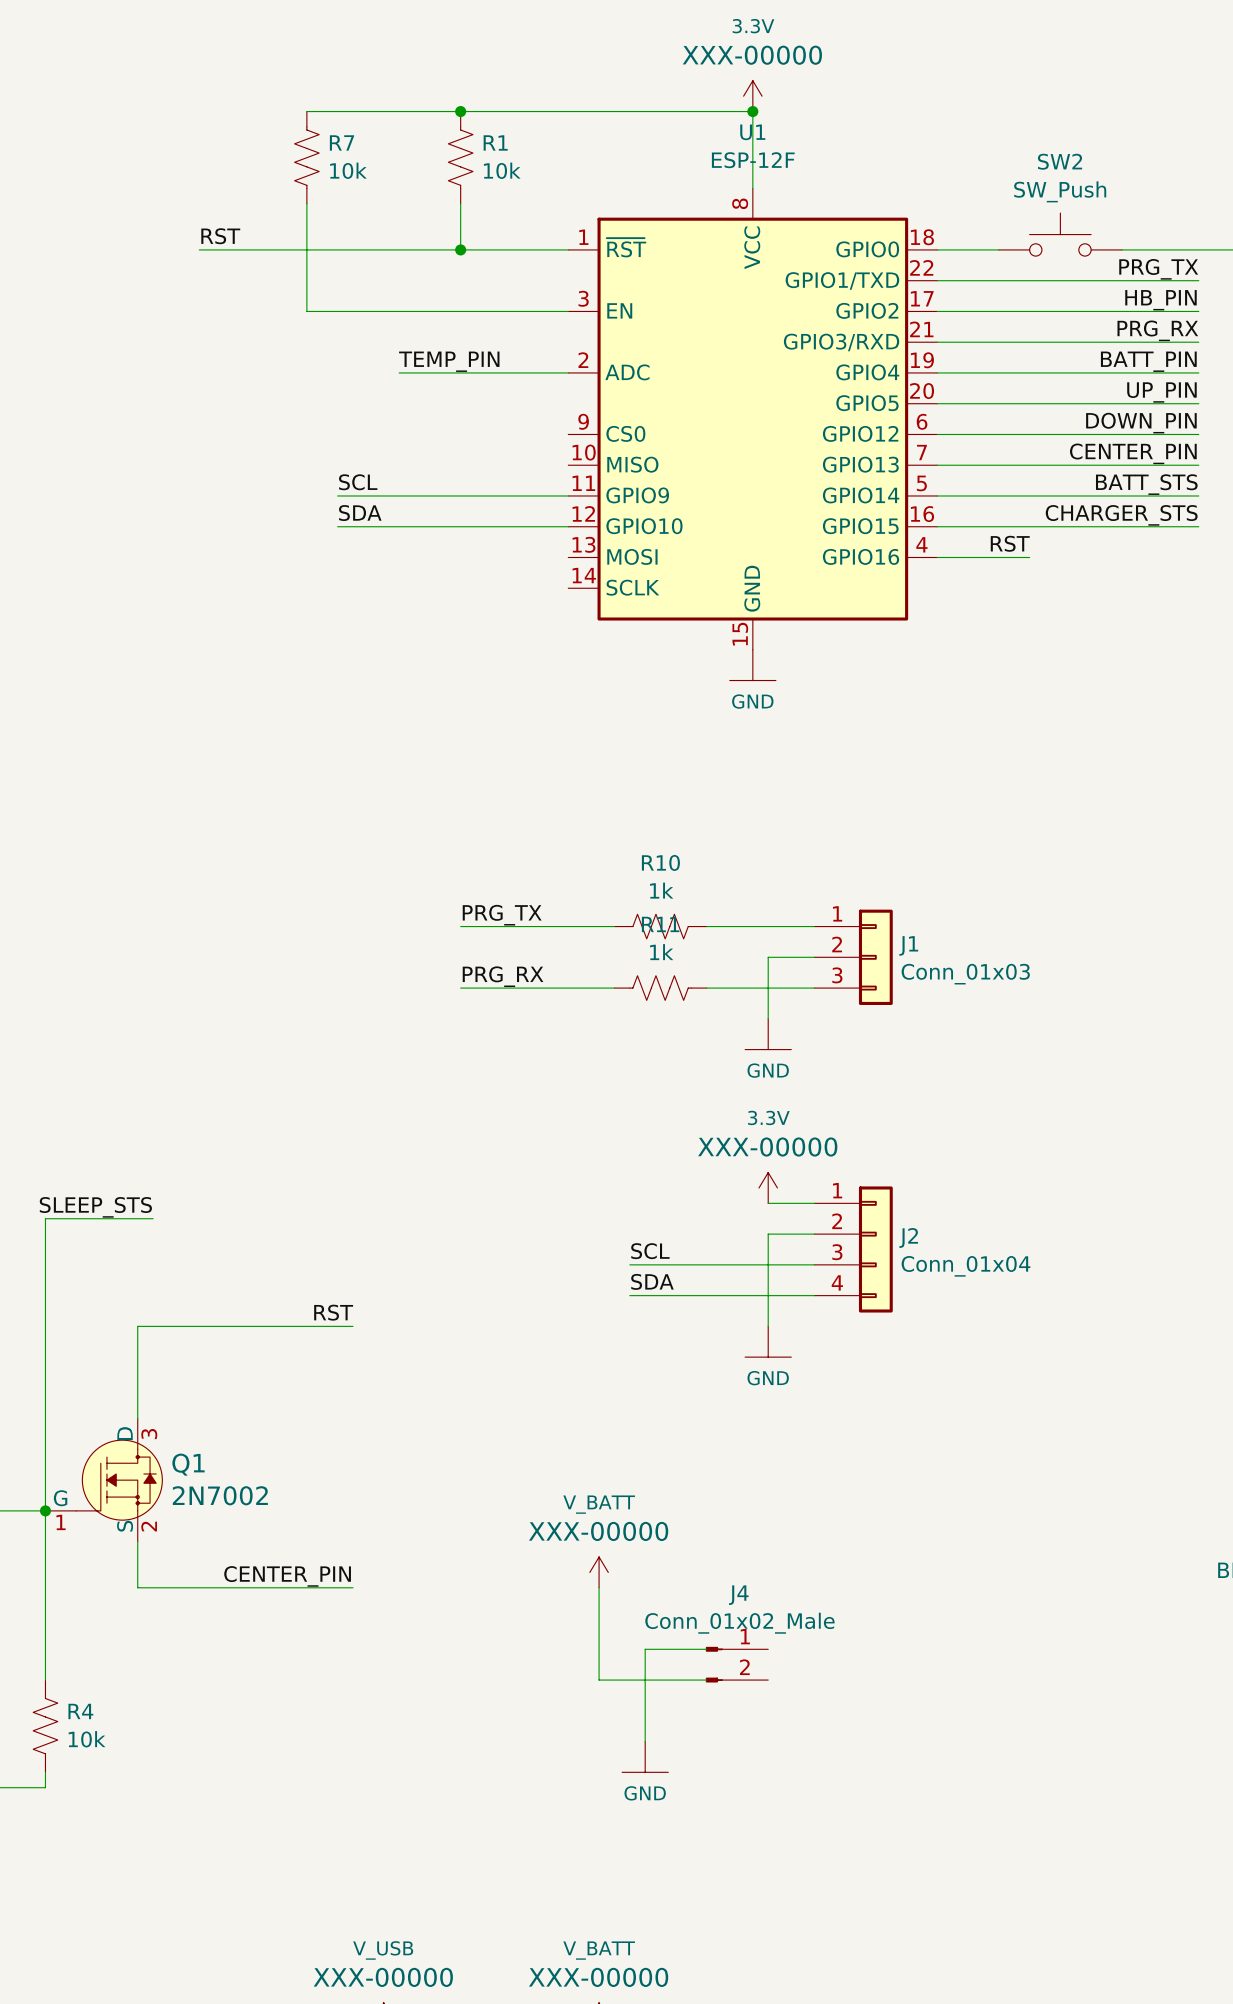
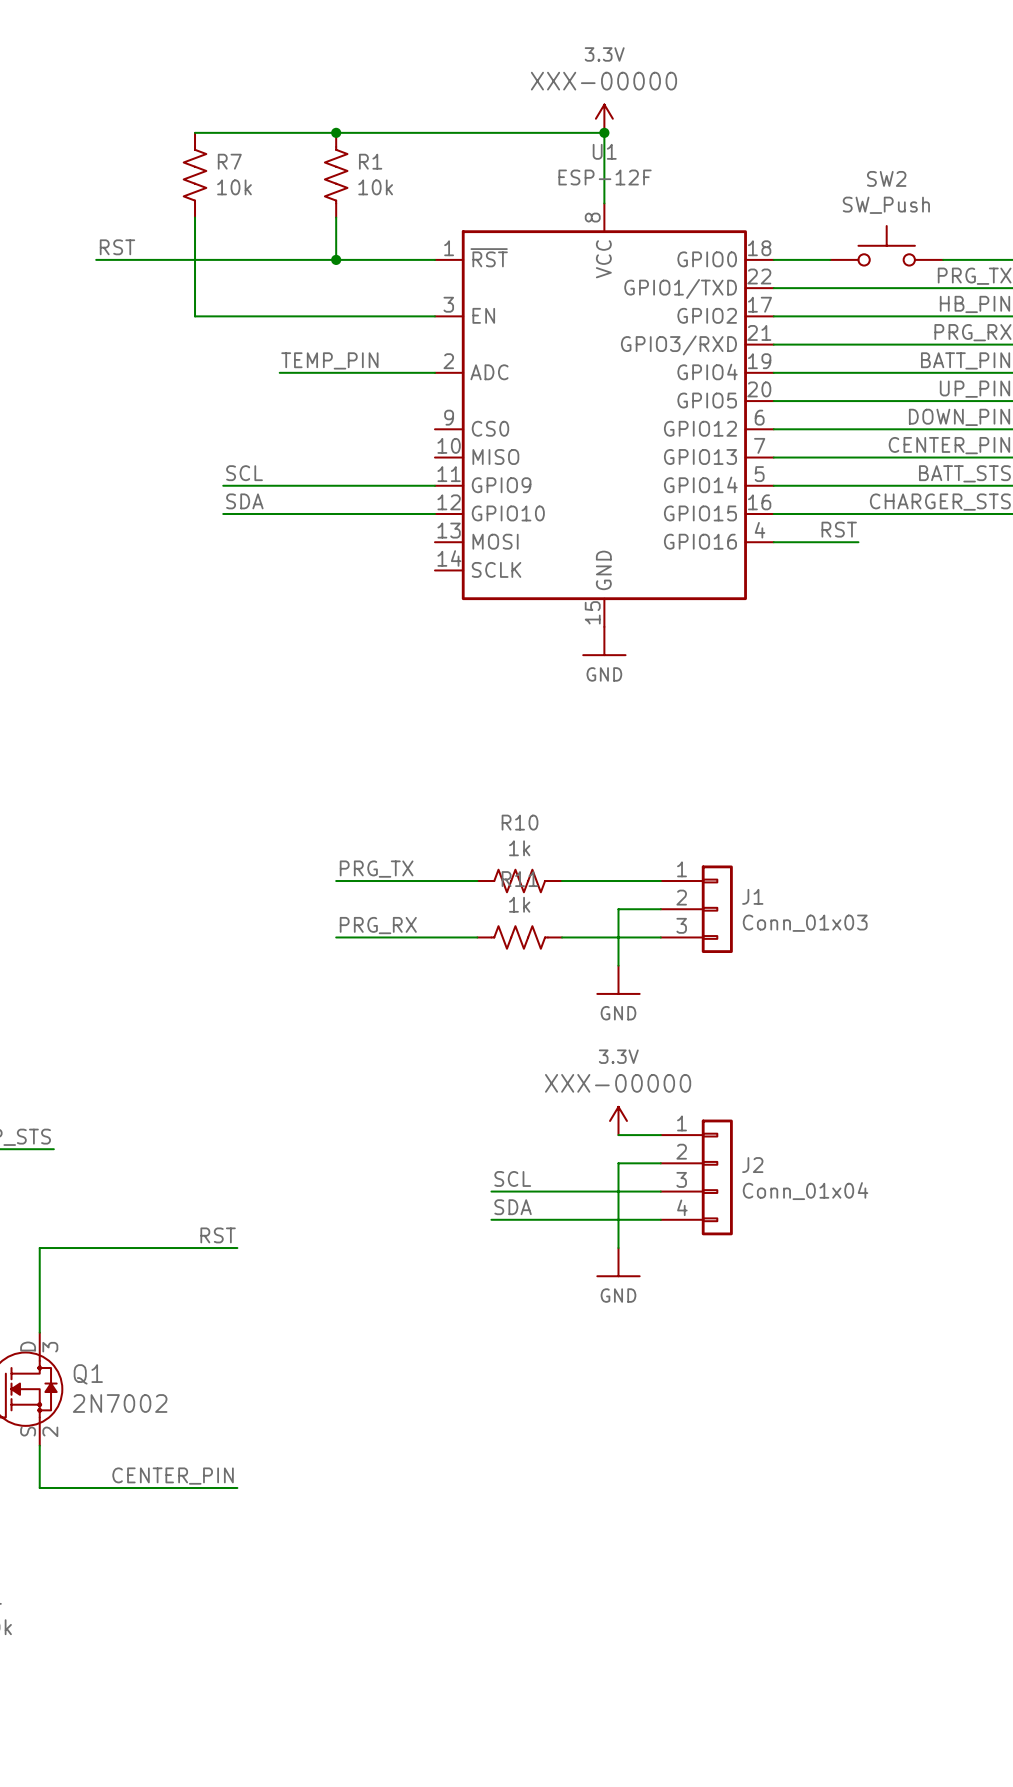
power symbol: V_BATT (599, 1572) -> none
wire: (599, 1587) (599, 1680) (706, 1680) -> none
wire: (706, 1649) (645, 1649) (645, 1741) -> none
J4: Conn_01x02_Male (736, 1664) -> none
power symbol: GND (645, 1756) -> none

